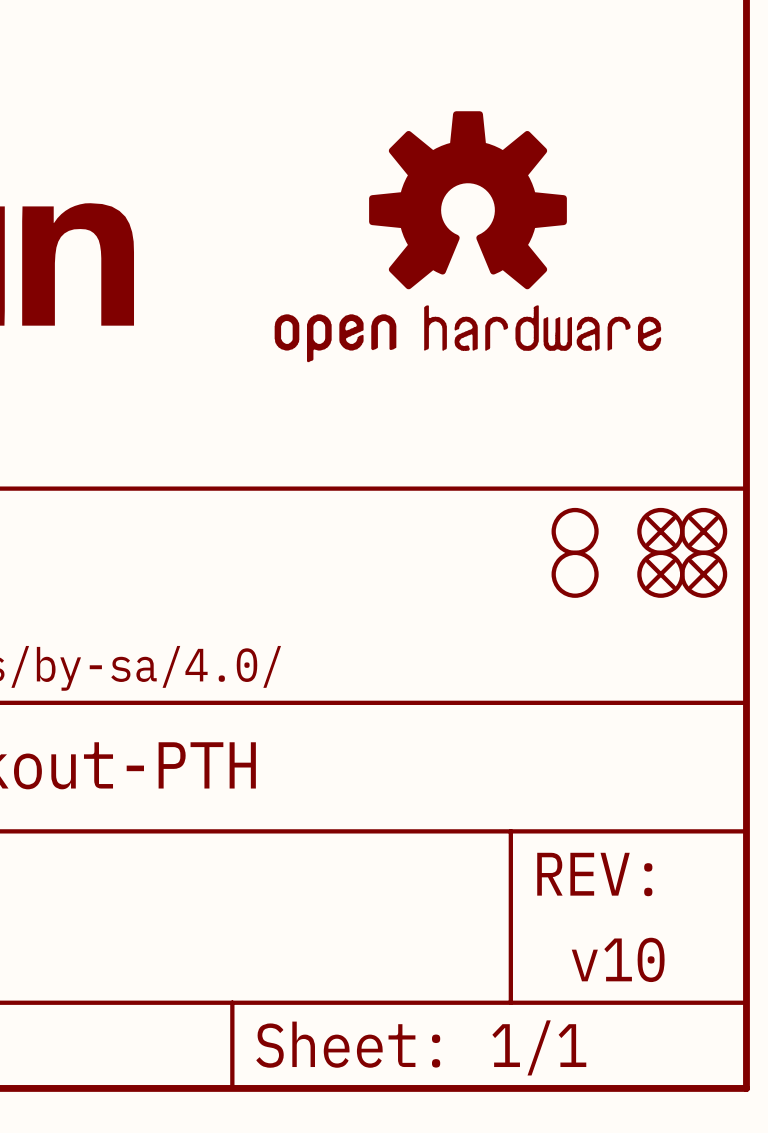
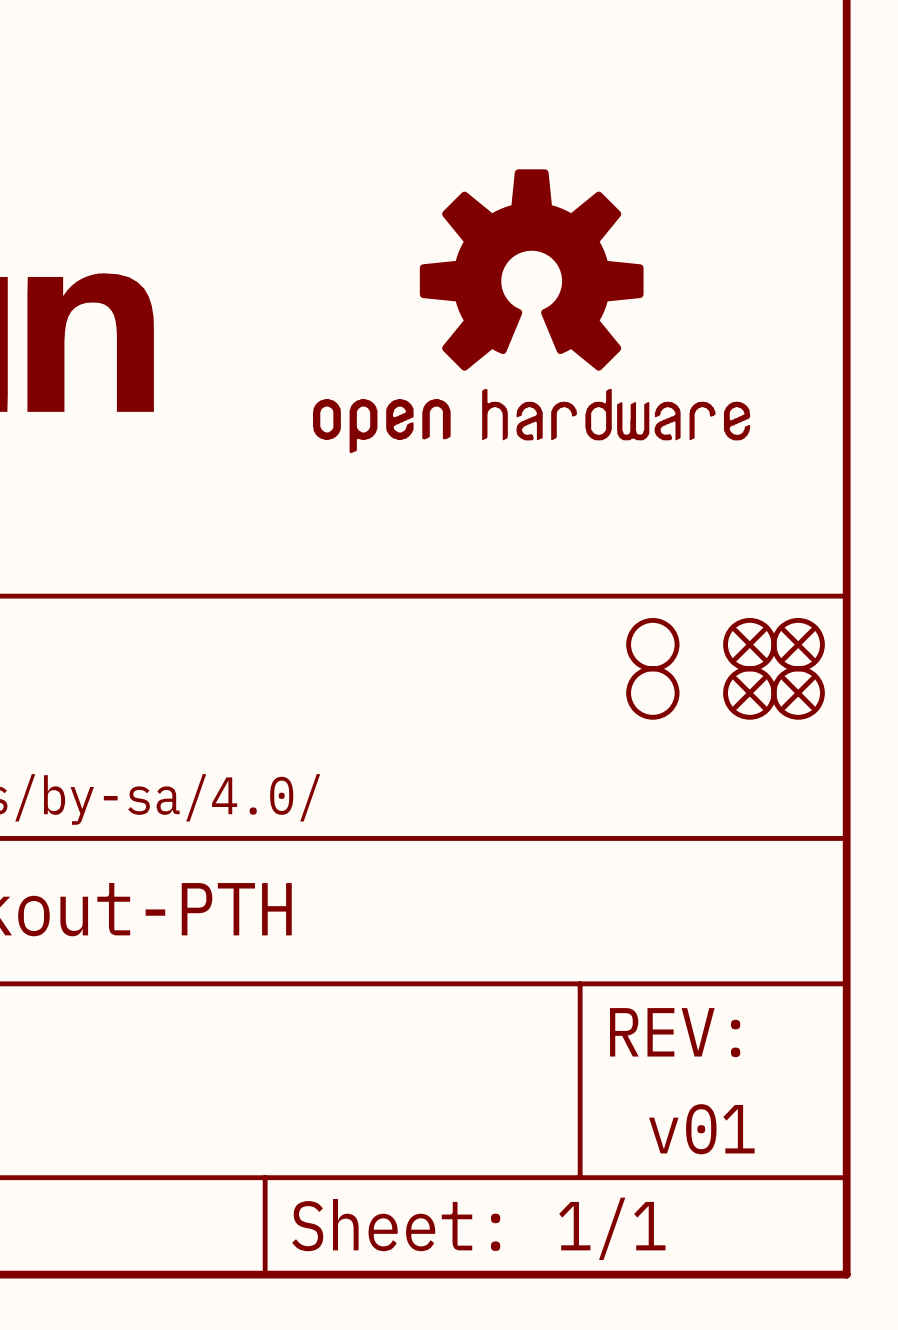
text: v10 (618, 959) -> v01 (701, 1129)

